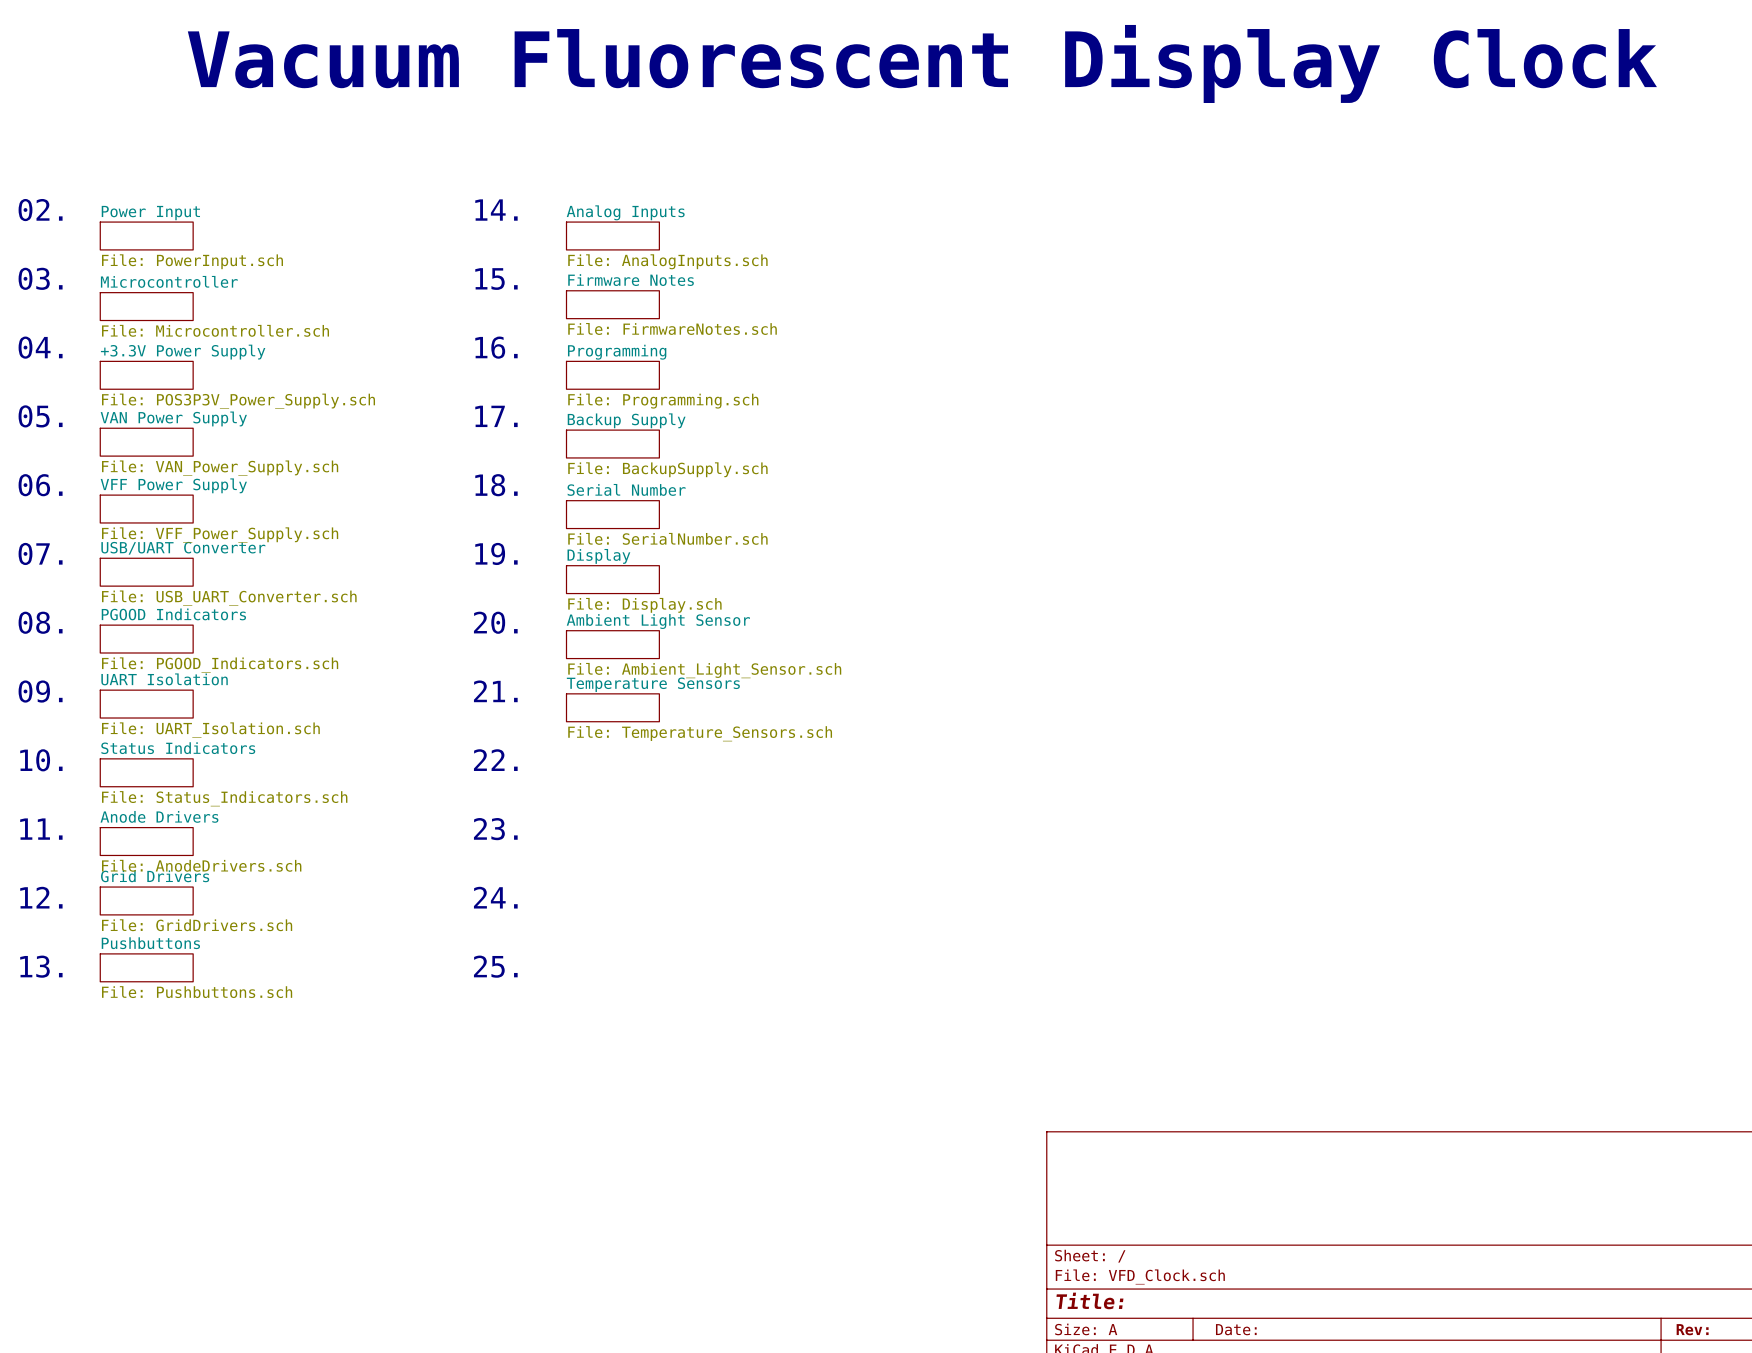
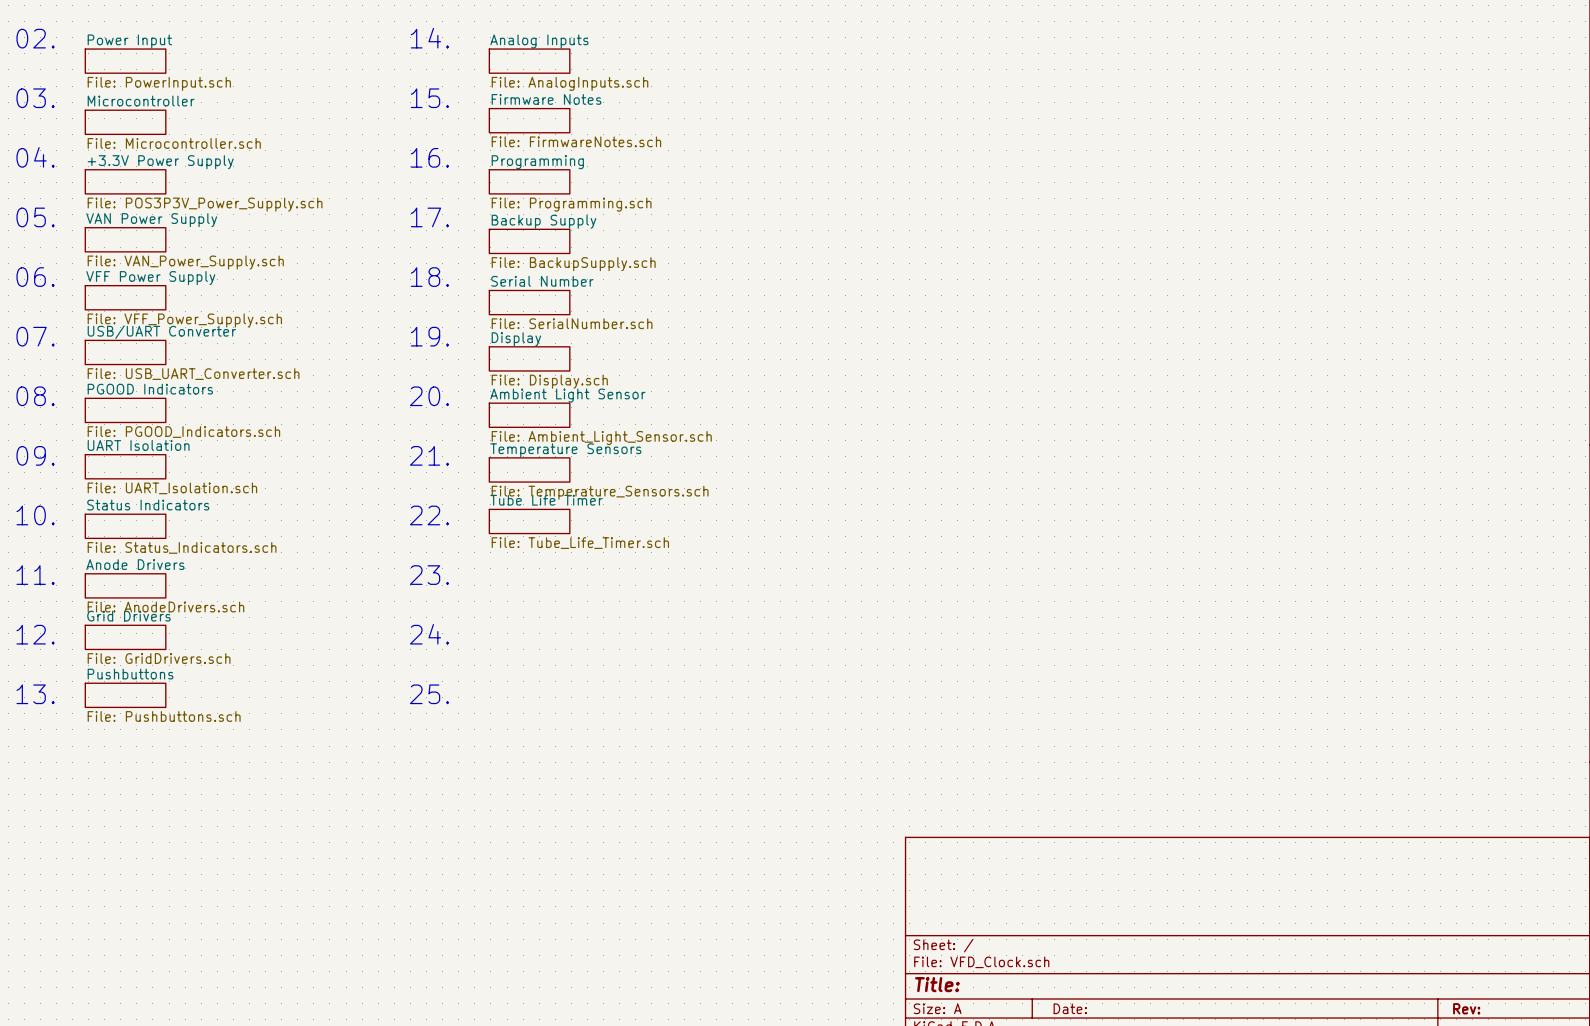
sheet Tube Life Timer: none -> File: Tube_Life_Timer.sch (529, 521)

